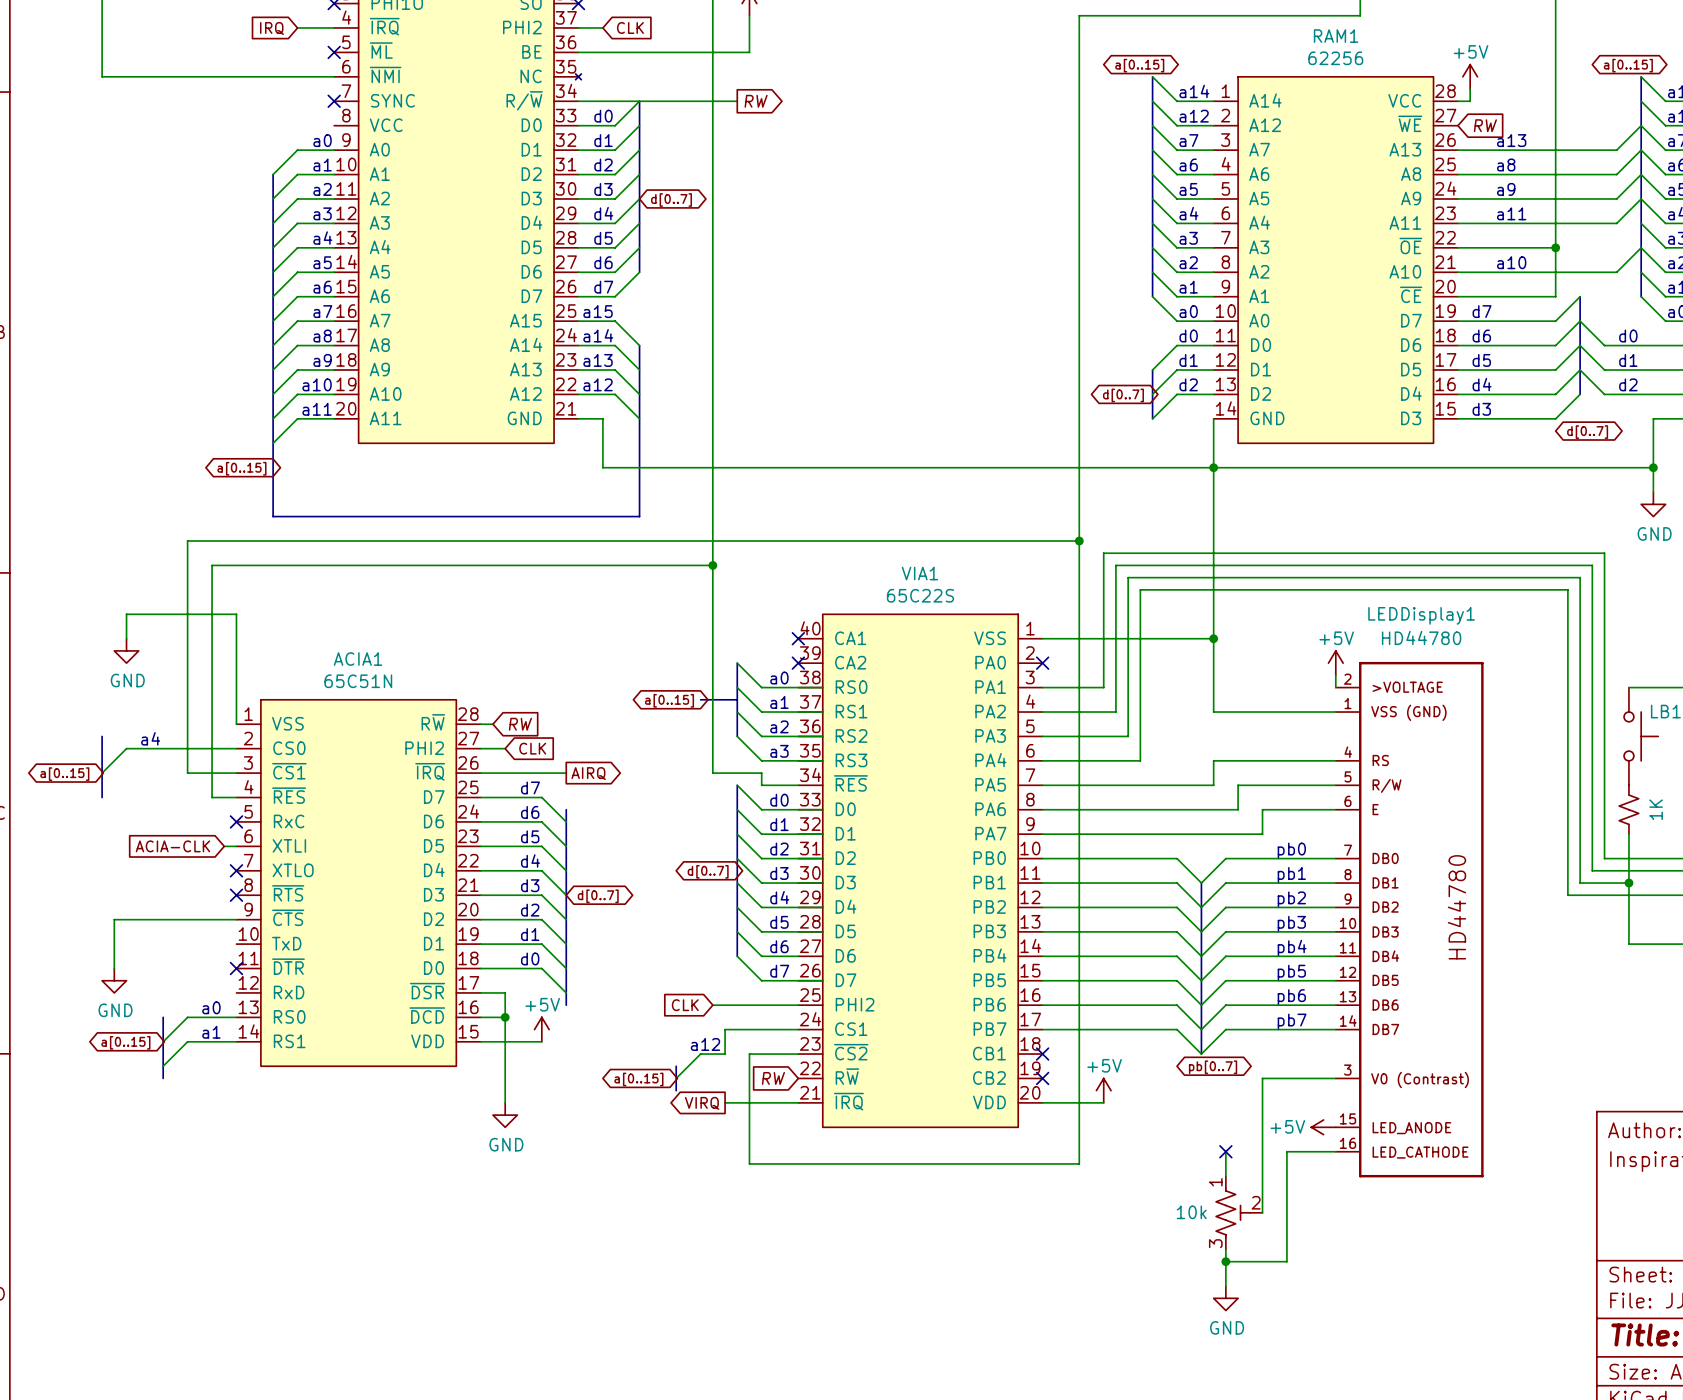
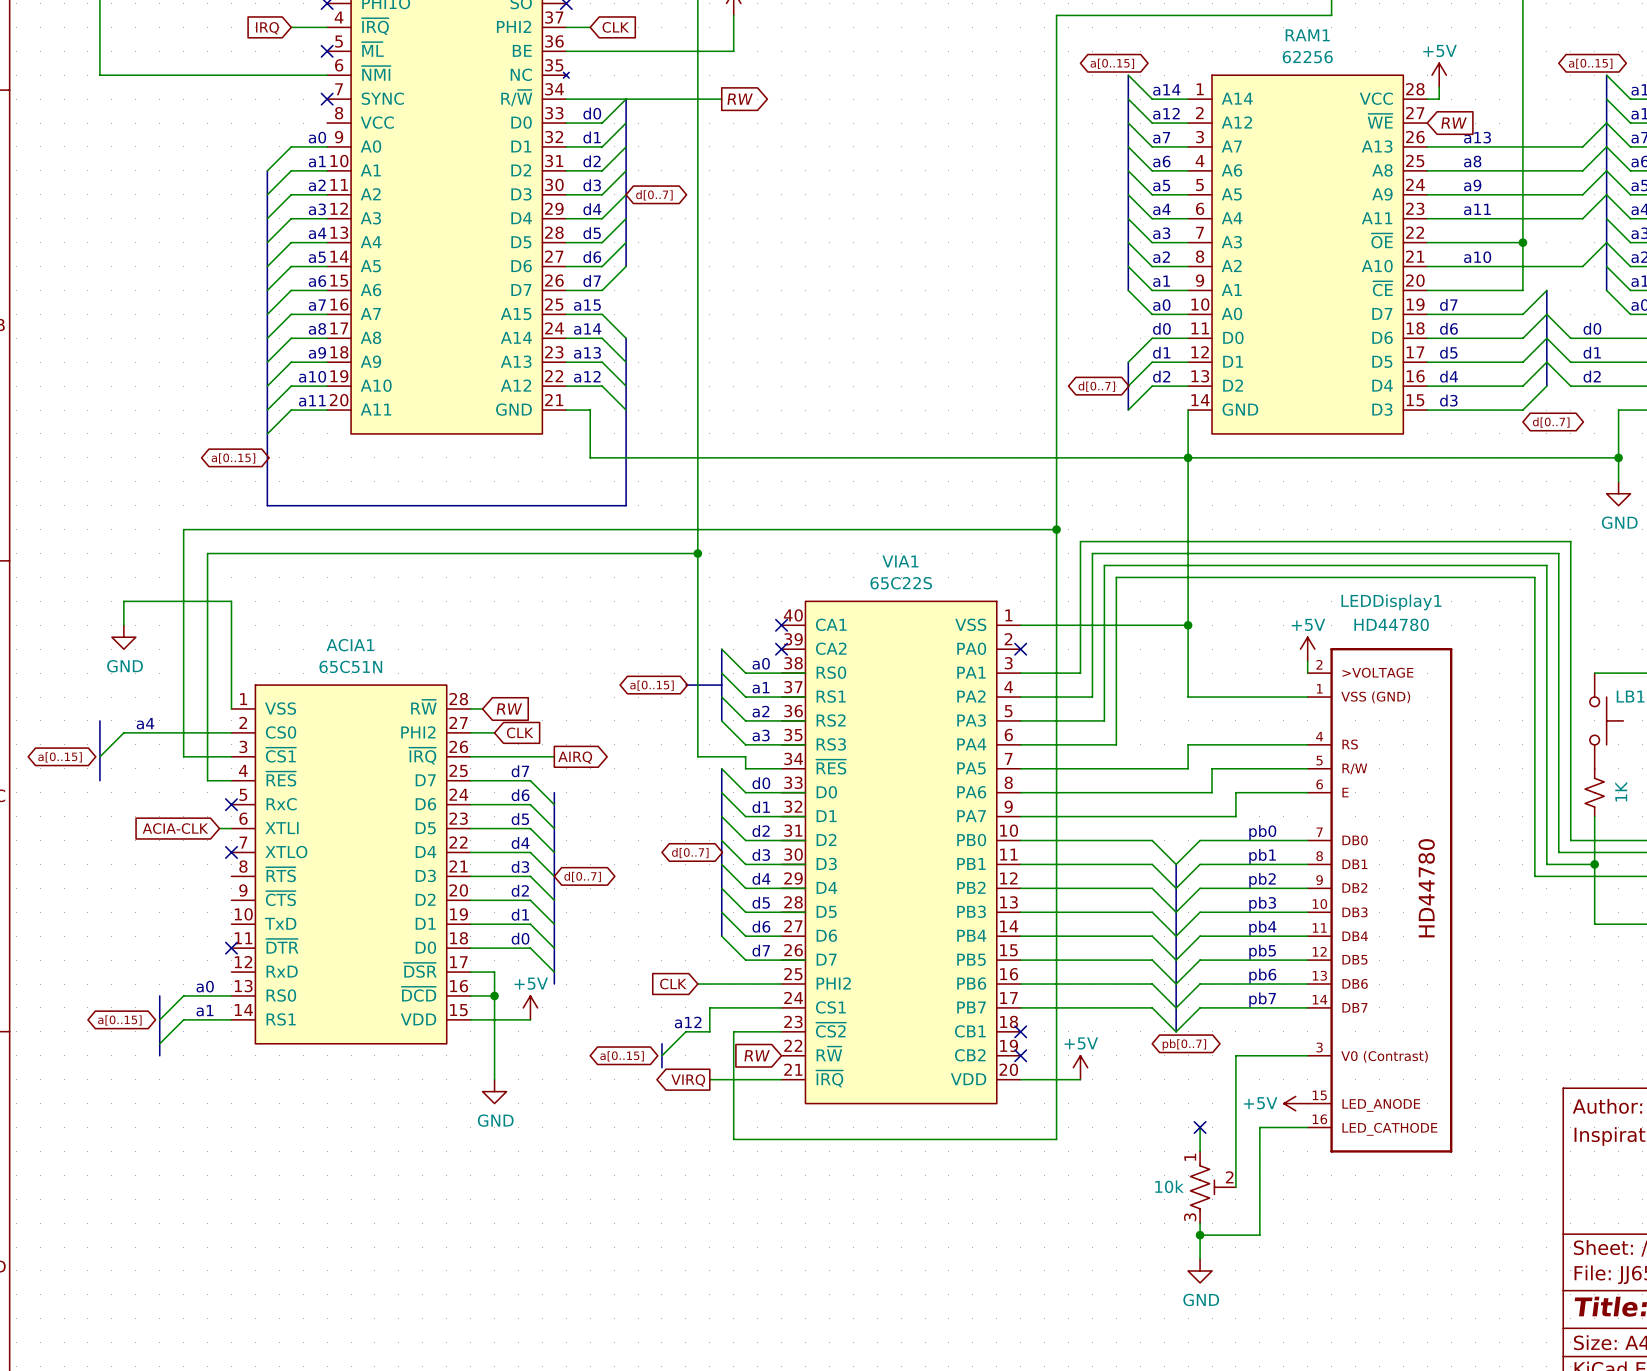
no-connect mark: (236, 895) -> none
wire: (236, 919) (114, 919) (114, 968) -> none
power symbol: GND (114, 980) -> none

